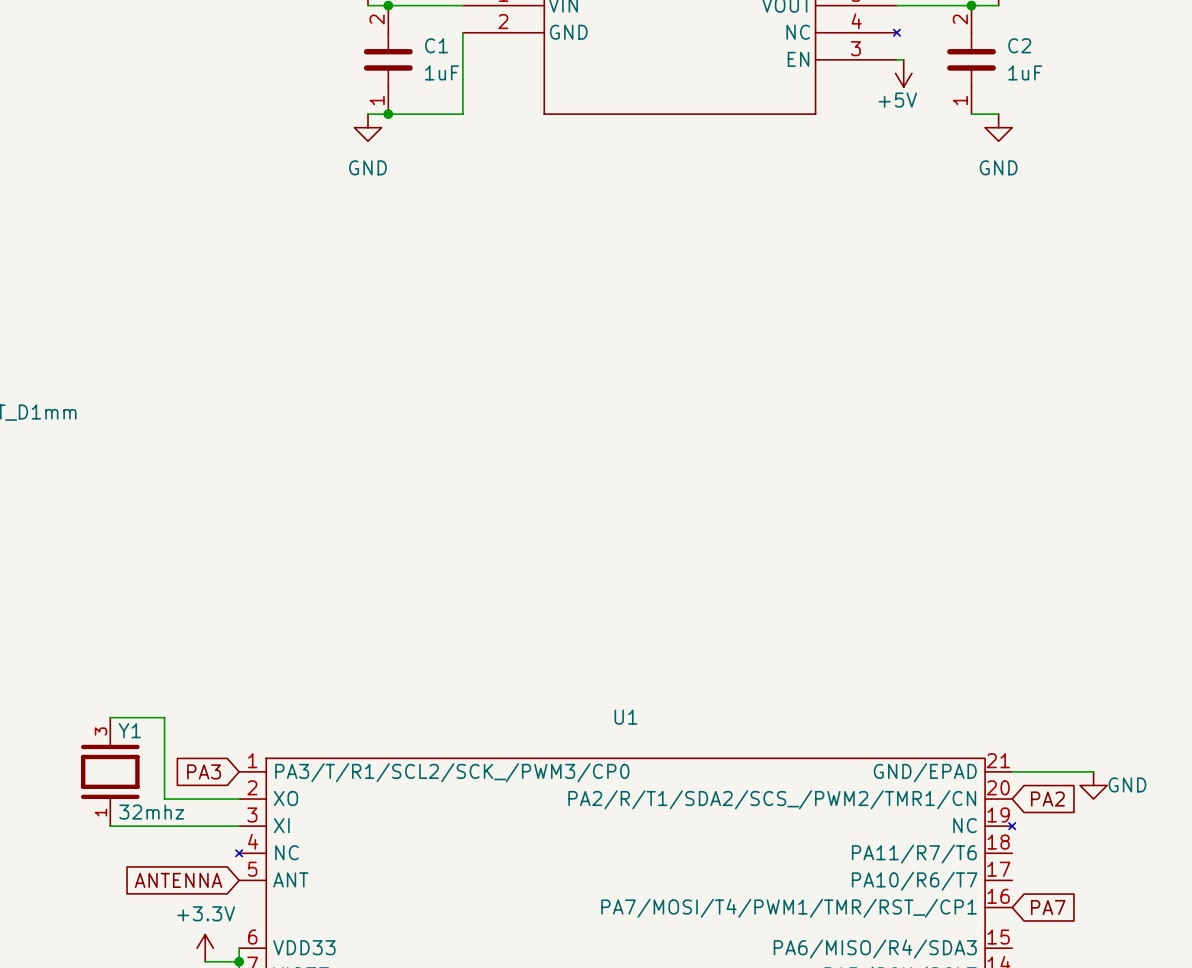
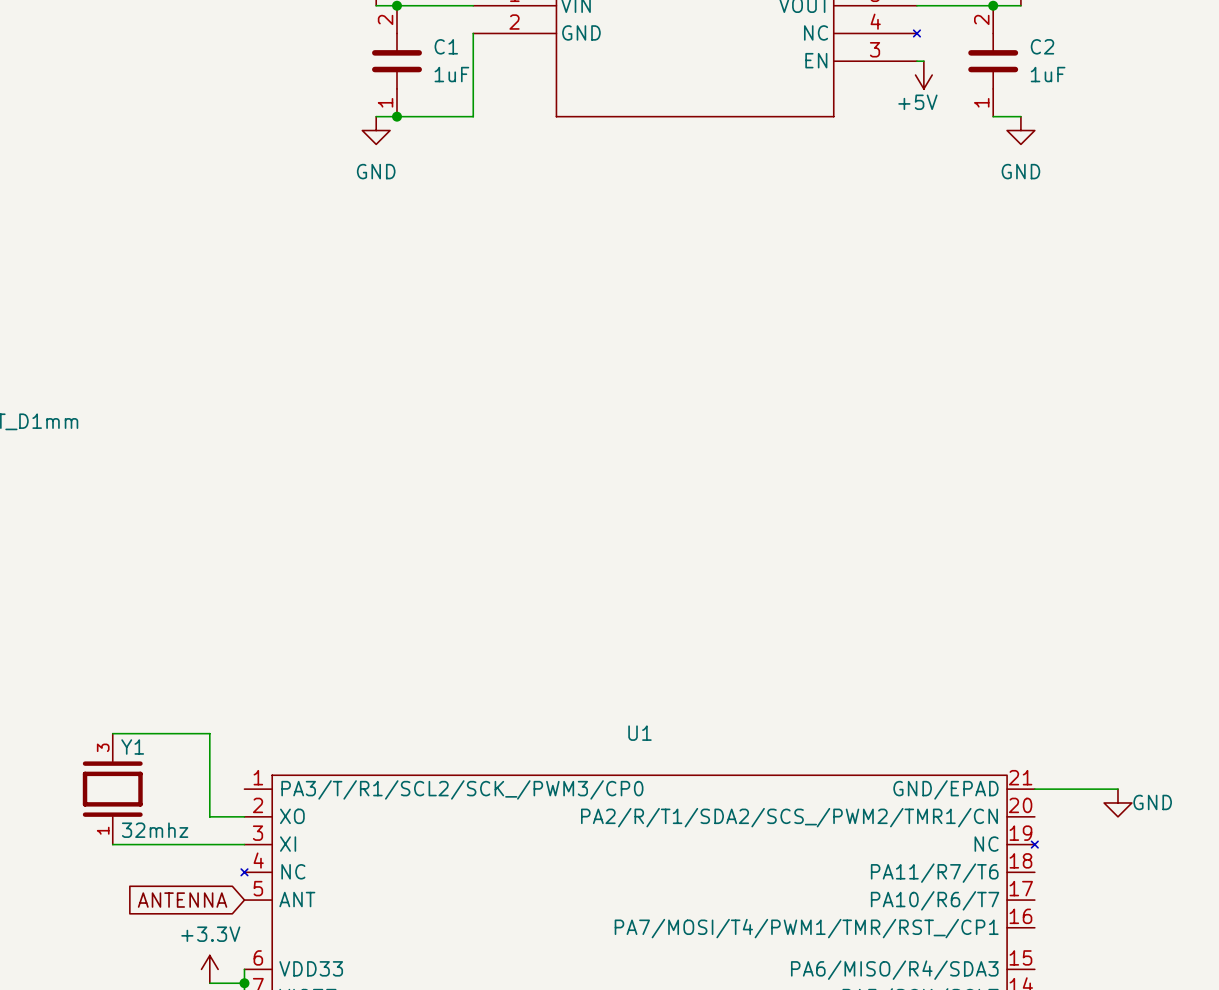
wire: (164, 717) (164, 799) (205, 799) -> (168, 733) (209, 733) (209, 816)
global label: PA3 (204, 771) -> none
global label: PA2 (1047, 799) -> none
global label: PA7 (1048, 907) -> none

